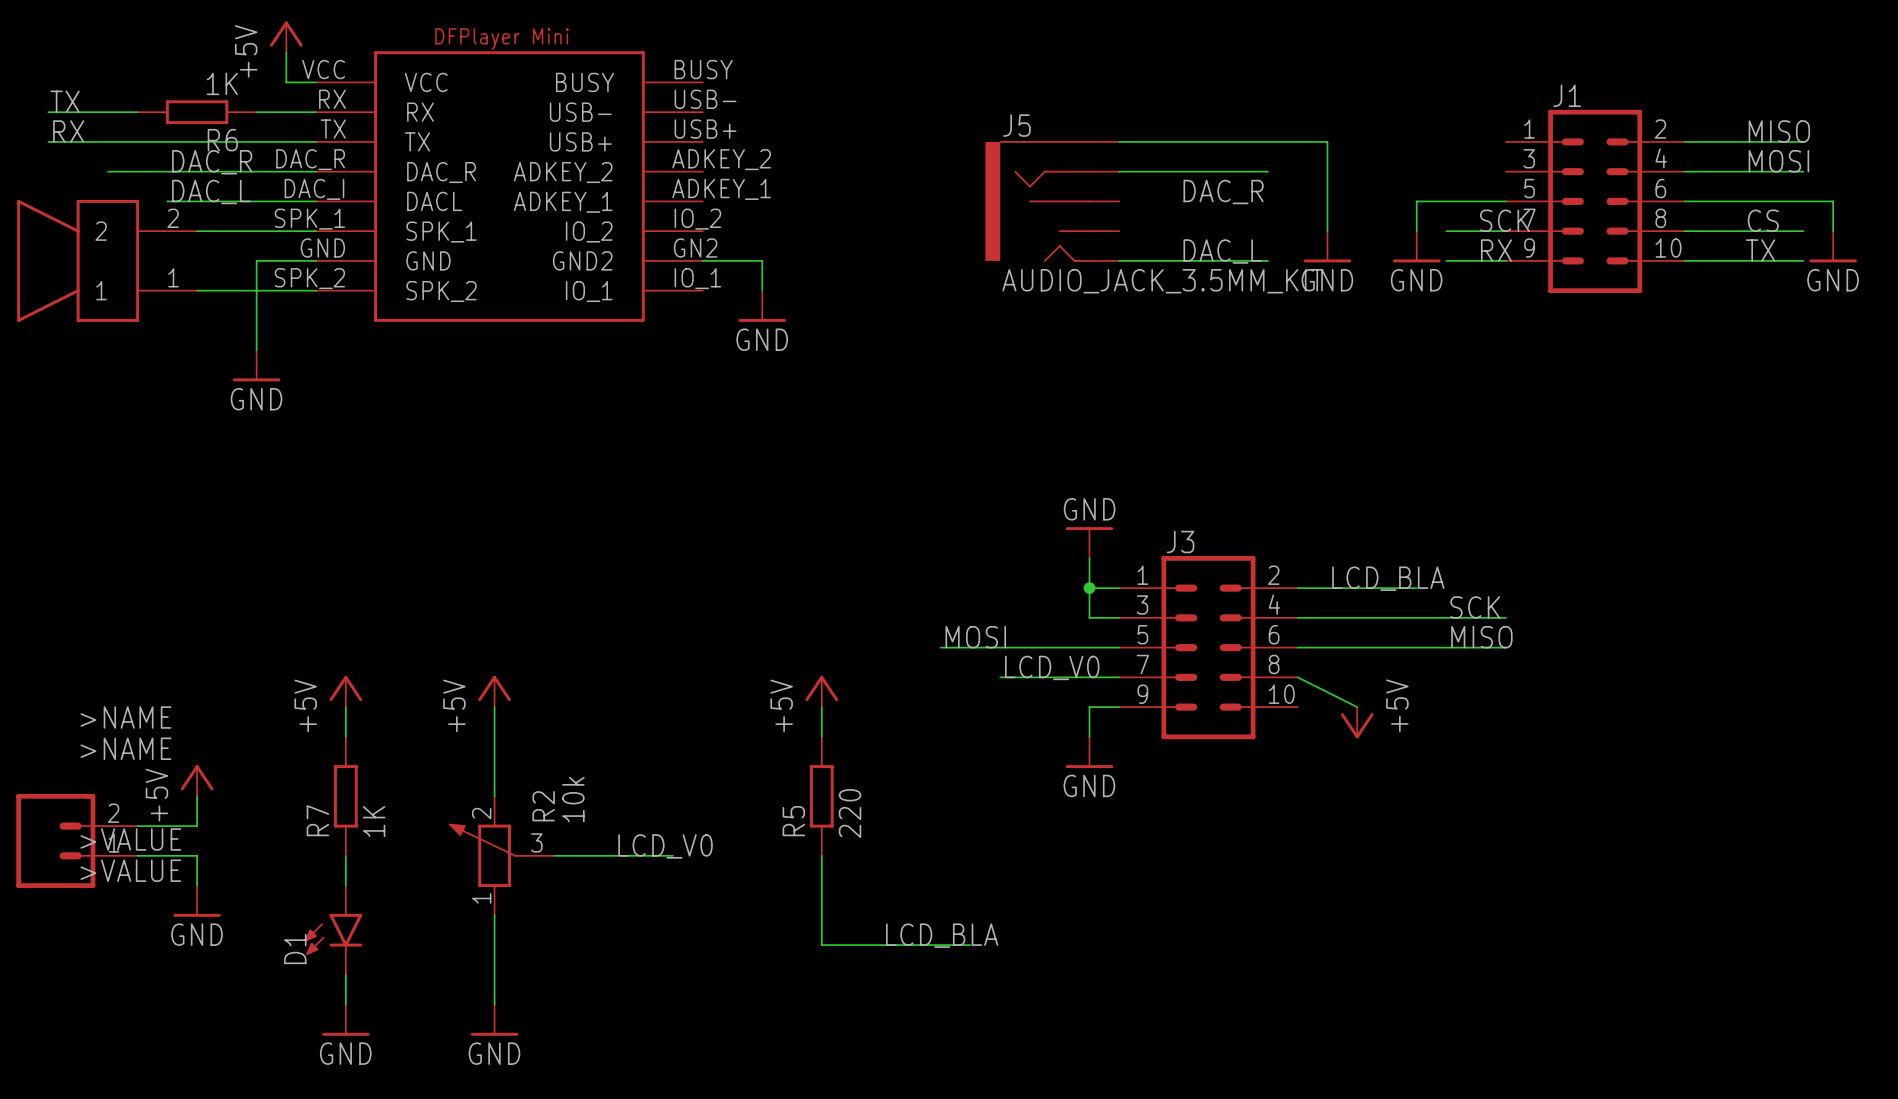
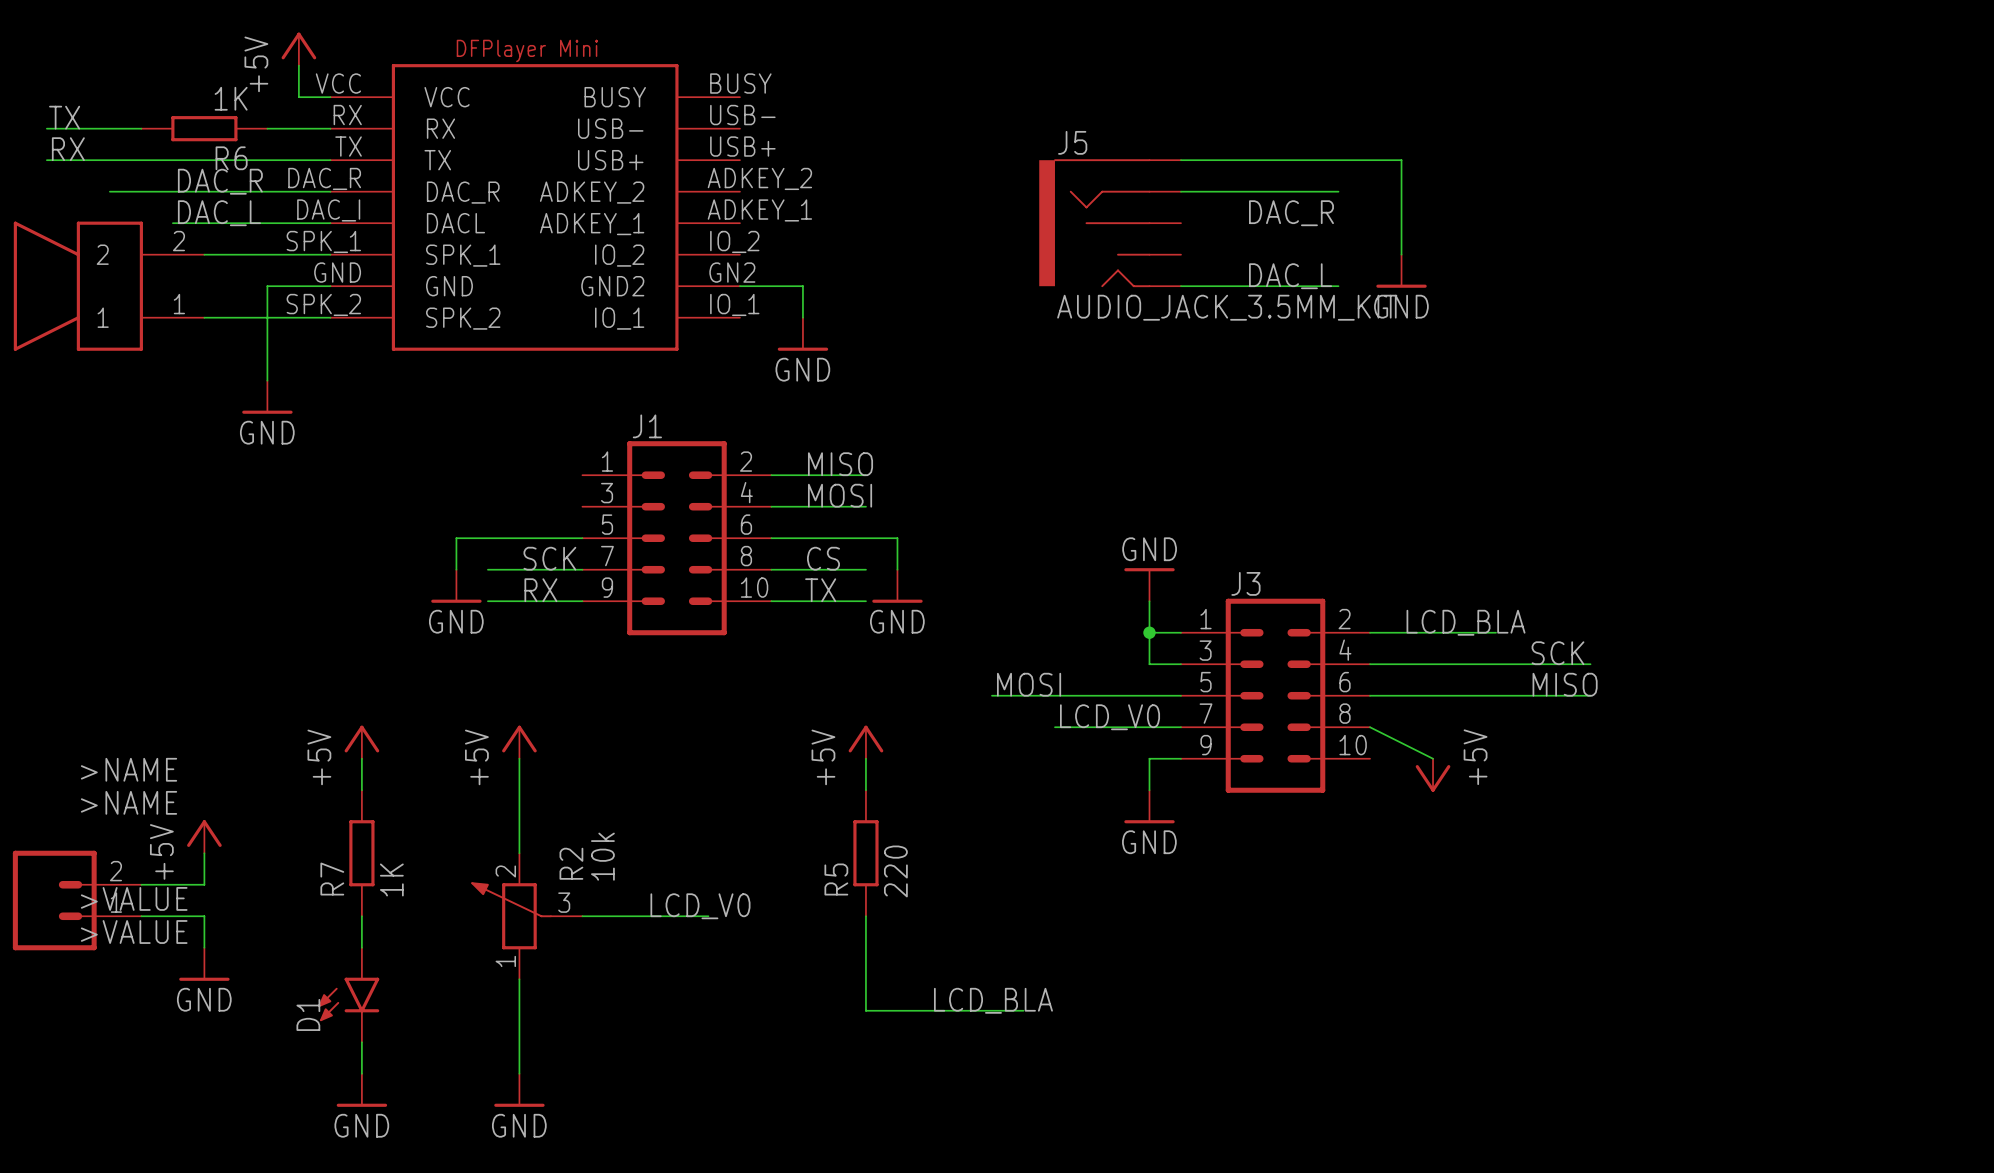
label: MISO (1779, 131) -> none
wire: (1684, 141) (1803, 141) -> none
label: MOSI (1778, 161) -> none
wire: (1684, 171) (1803, 171) -> none
wire: (1505, 201) (1416, 201) (1416, 231) -> none
J1 position: (1595, 201) -> (676, 538)
wire: (1684, 201) (1833, 201) (1833, 231) -> none
label: SCK (1504, 220) -> none
label: CS (1763, 220) -> none
wire: (1446, 231) (1505, 231) -> none
wire: (1684, 231) (1803, 231) -> none
power symbol: GND (1416, 246) -> none
power symbol: GND (1833, 246) -> none
label: RX (1496, 250) -> none
label: TX (1760, 250) -> none
wire: (1446, 260) (1505, 260) -> none
wire: (1684, 260) (1803, 260) -> none
label: none -> MISO (840, 464)
wire: none -> (771, 475) (865, 475)
label: none -> MOSI (840, 495)
wire: none -> (771, 506) (865, 506)
wire: none -> (582, 538) (456, 538) (456, 569)
wire: none -> (771, 538) (897, 538) (897, 569)
label: none -> SCK (549, 558)
label: none -> CS (823, 558)
wire: none -> (487, 569) (582, 569)
wire: none -> (771, 569) (865, 569)
power symbol: none -> GND (456, 586)
power symbol: none -> GND (897, 586)
label: none -> RX (540, 590)
label: none -> TX (820, 590)
wire: none -> (487, 601) (582, 601)
wire: none -> (771, 601) (865, 601)

